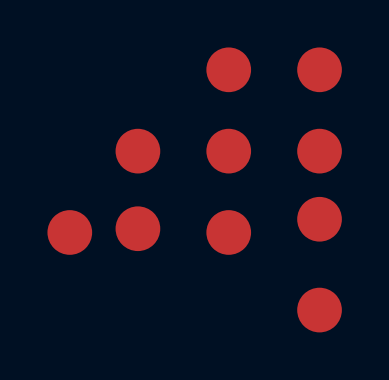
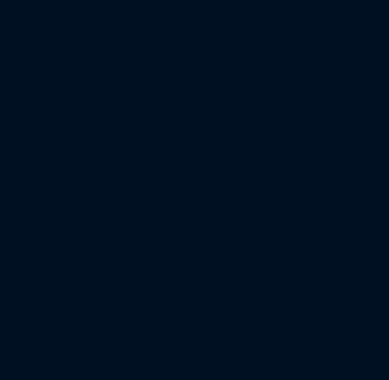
part: (228, 69) -> none
part: (319, 69) -> none
part: (137, 151) -> none
part: (228, 151) -> none
part: (319, 151) -> none
part: (319, 219) -> none
part: (137, 228) -> none
part: (69, 232) -> none
part: (228, 232) -> none
part: (319, 310) -> none

